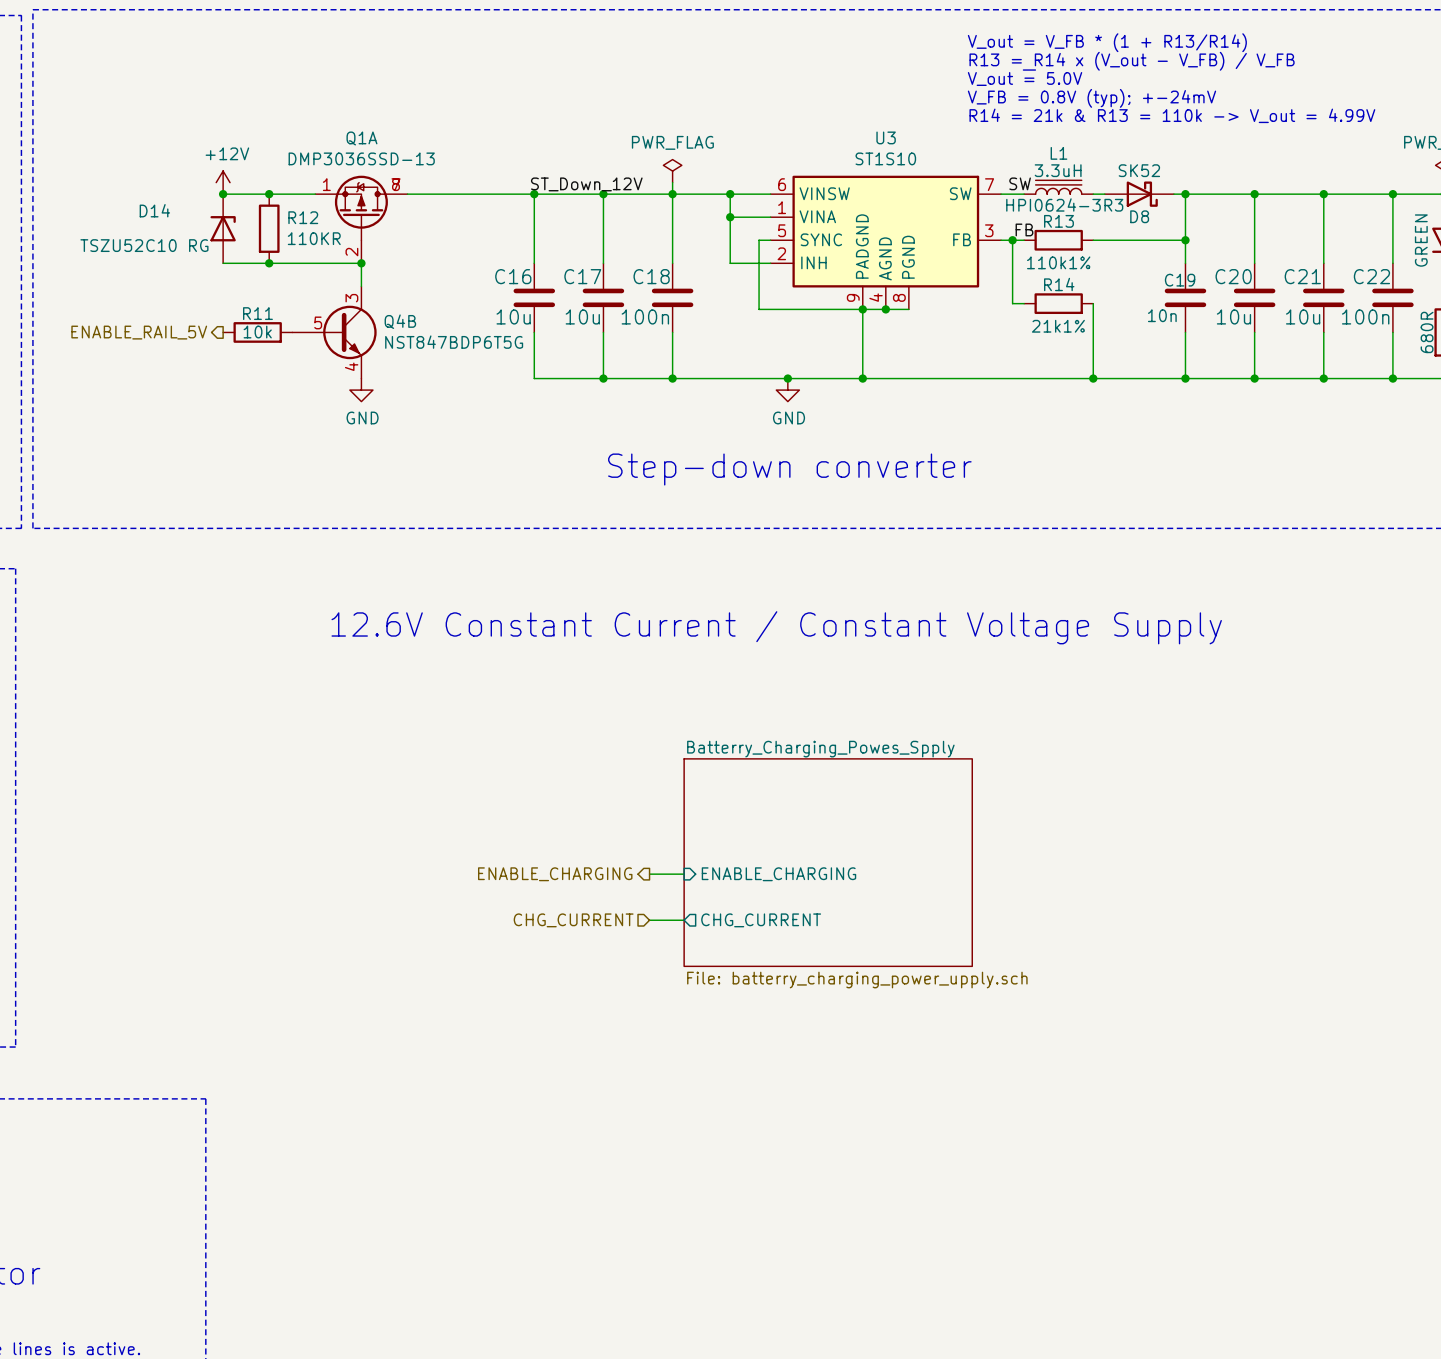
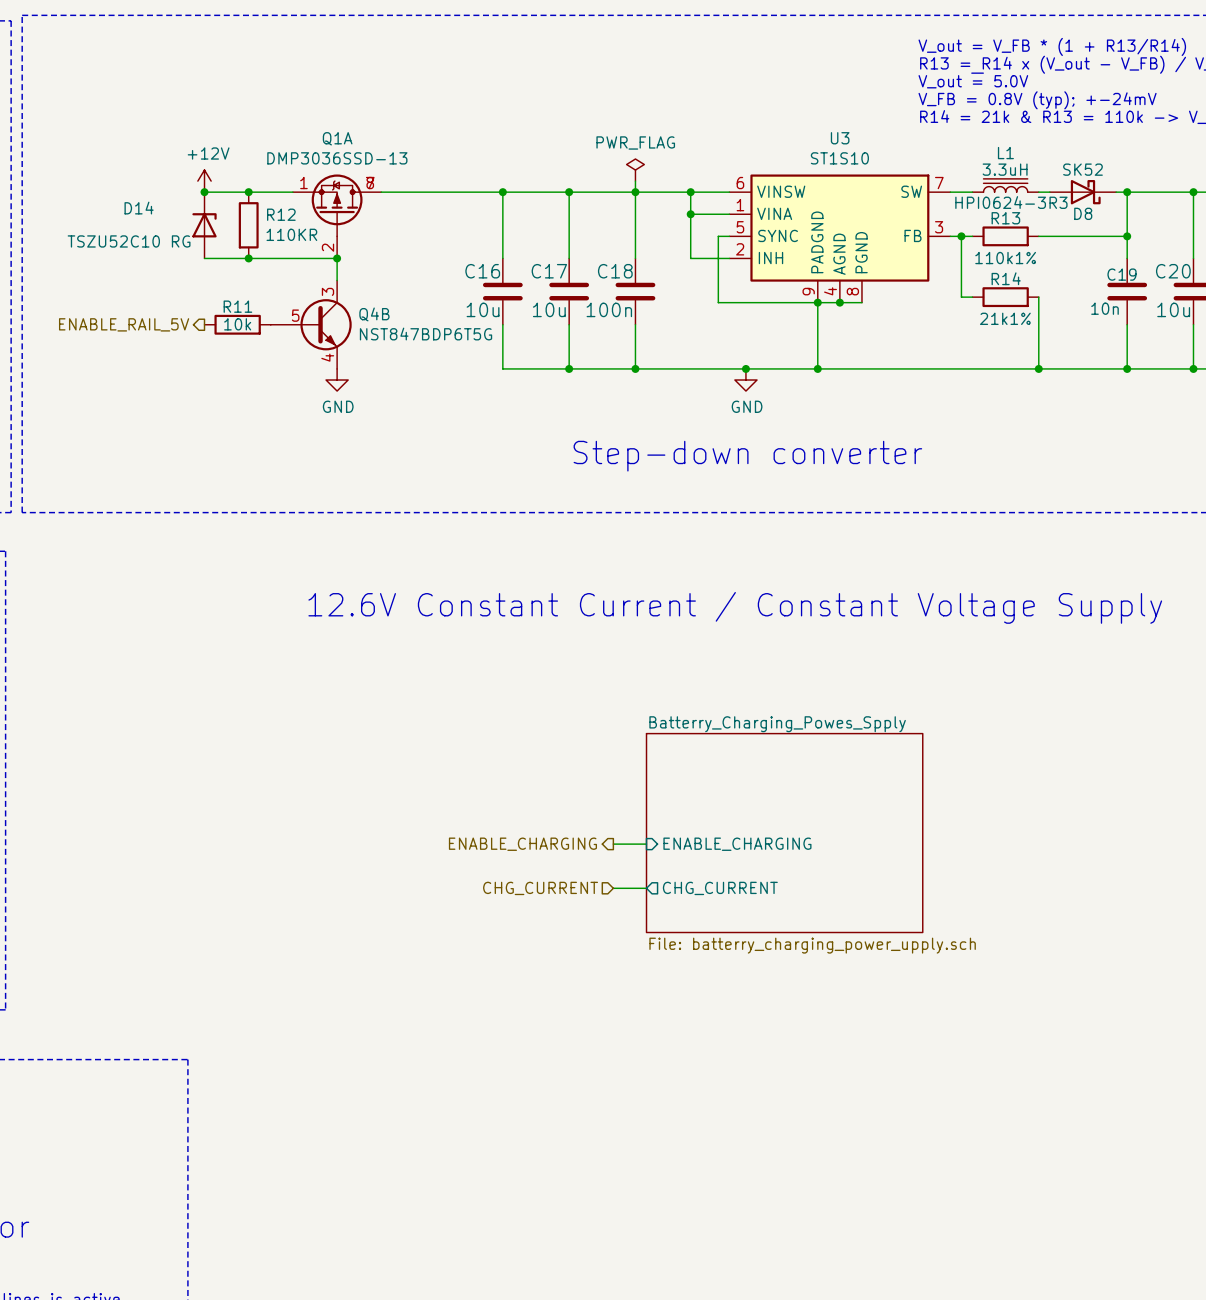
label: SW (1020, 183) -> none
label: ST_Down_12V (586, 184) -> none
label: FB (1024, 229) -> none

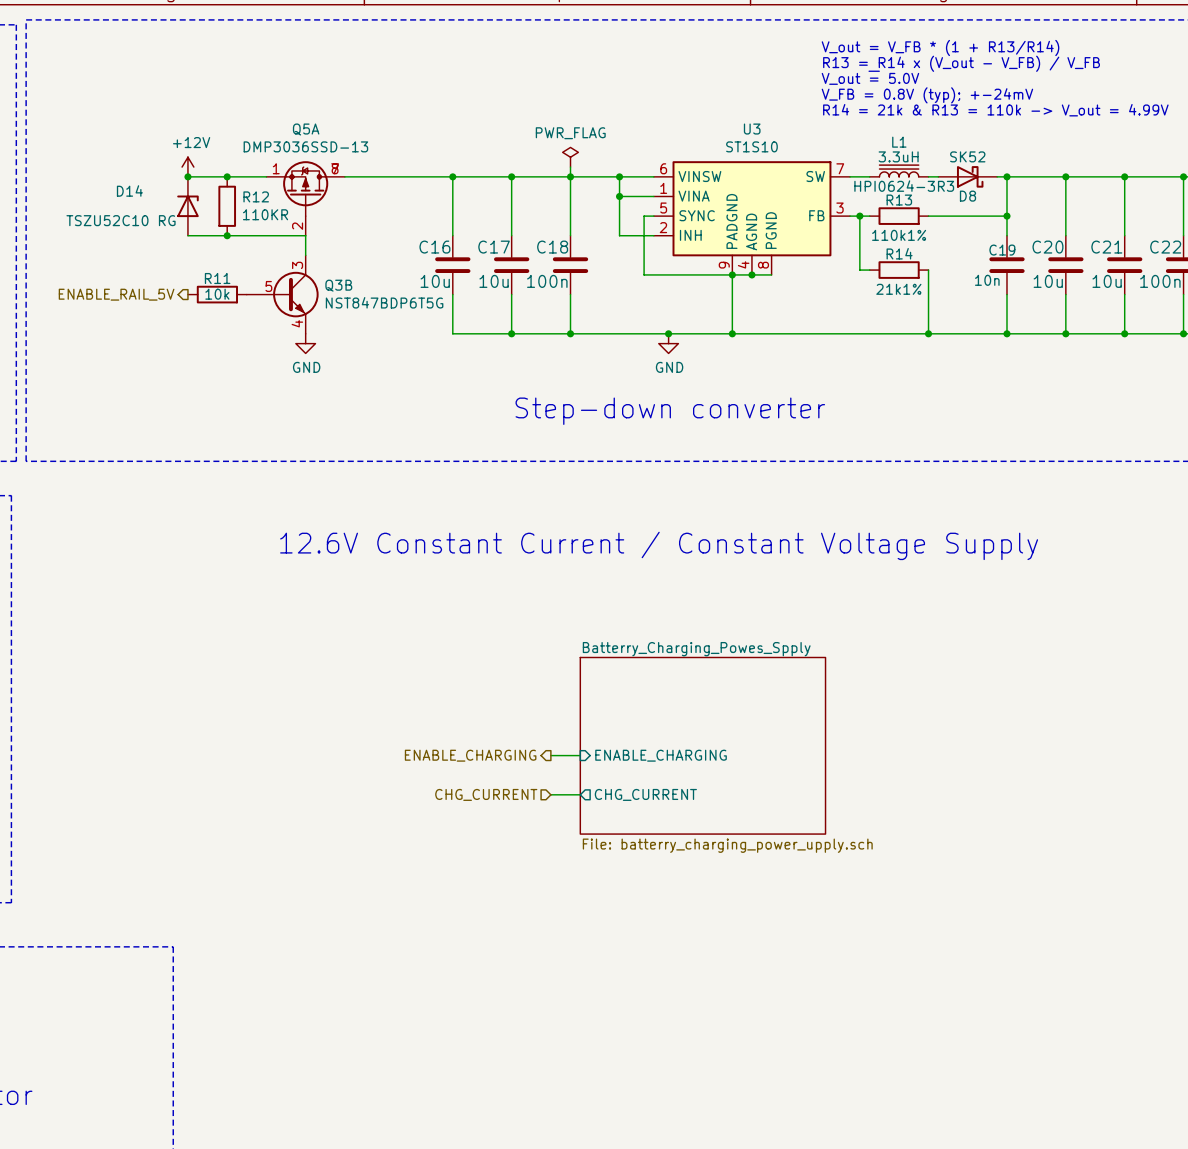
Q1A name: Q1A (337, 138) -> Q5A (306, 129)
junction: (337, 258) -> none
Q4B name: Q4B (374, 314) -> Q3B (338, 285)

